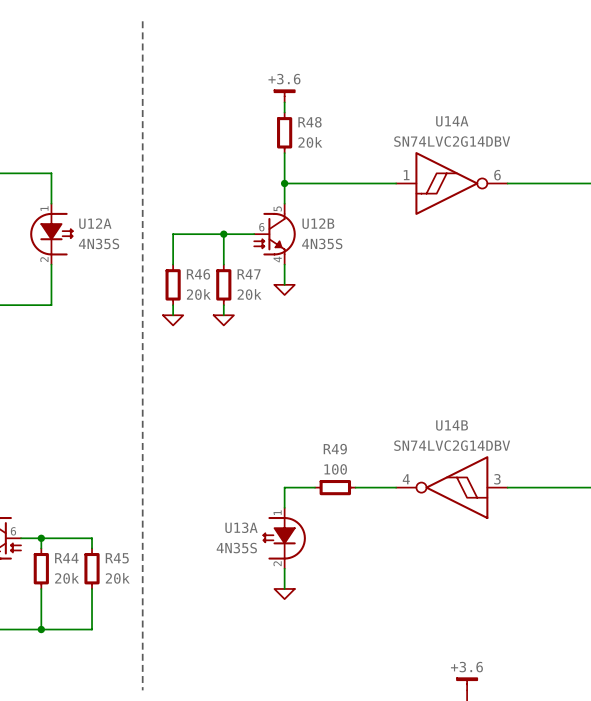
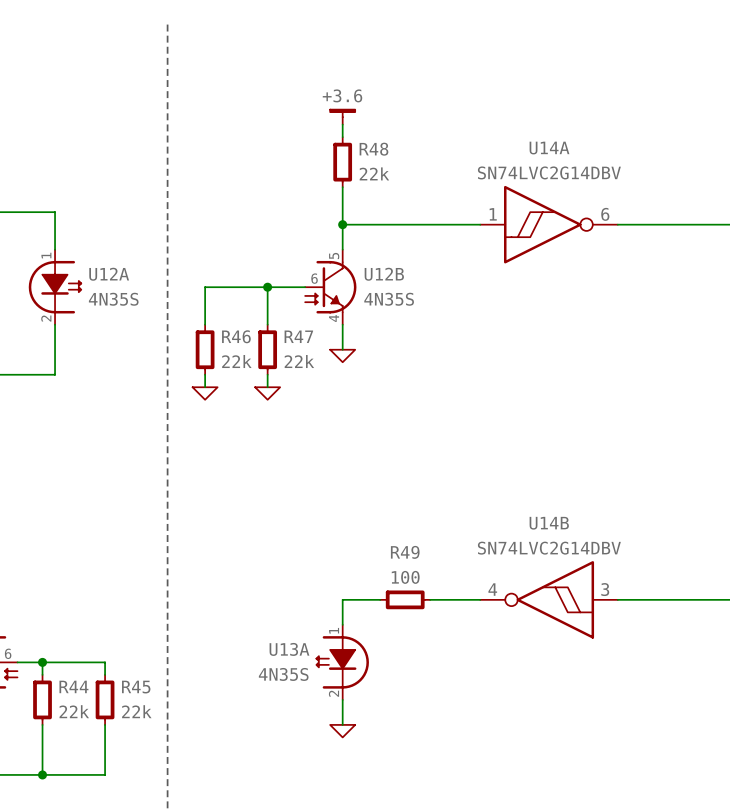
R48 value: 20k (310, 142) -> 22k (374, 173)
R46 value: 20k (198, 294) -> 22k (236, 361)
R47 value: 20k (249, 294) -> 22k (299, 361)
R44 value: 20k (67, 578) -> 22k (74, 711)
R45 value: 20k (117, 578) -> 22k (136, 711)

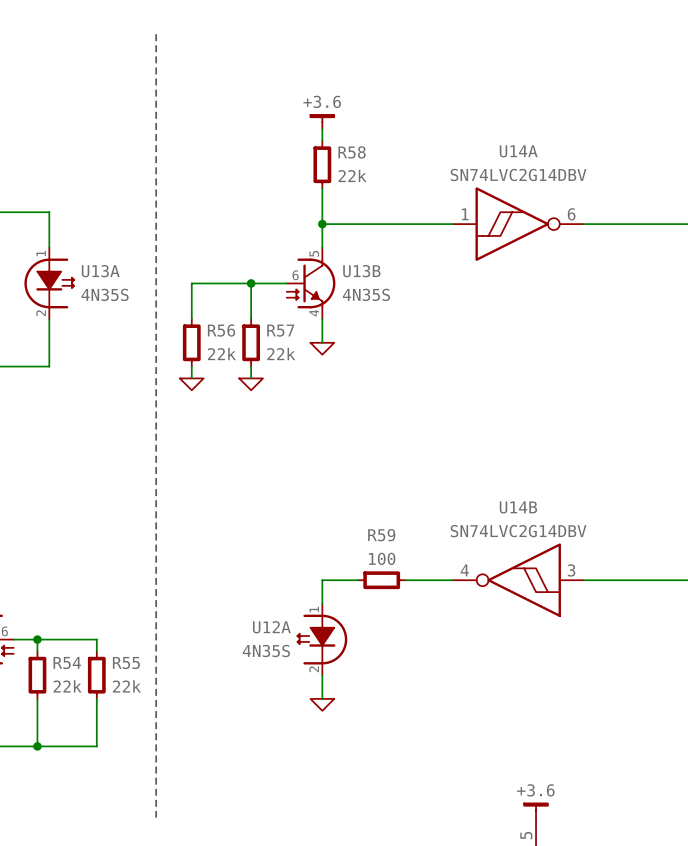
R48 name: R48 (373, 149) -> R58 (352, 152)
U12A name: U12A (109, 274) -> U13A (100, 271)
U12B name: U12B (384, 274) -> U13B (361, 271)
R46 name: R46 (236, 336) -> R56 (221, 330)
R47 name: R47 (298, 336) -> R57 (280, 330)
R49 name: R49 (405, 552) -> R59 (381, 535)
U13A name: U13A (289, 649) -> U12A (271, 627)
R44 name: R44 (73, 686) -> R54 (67, 662)
R45 name: R45 (136, 687) -> R55 (126, 662)

